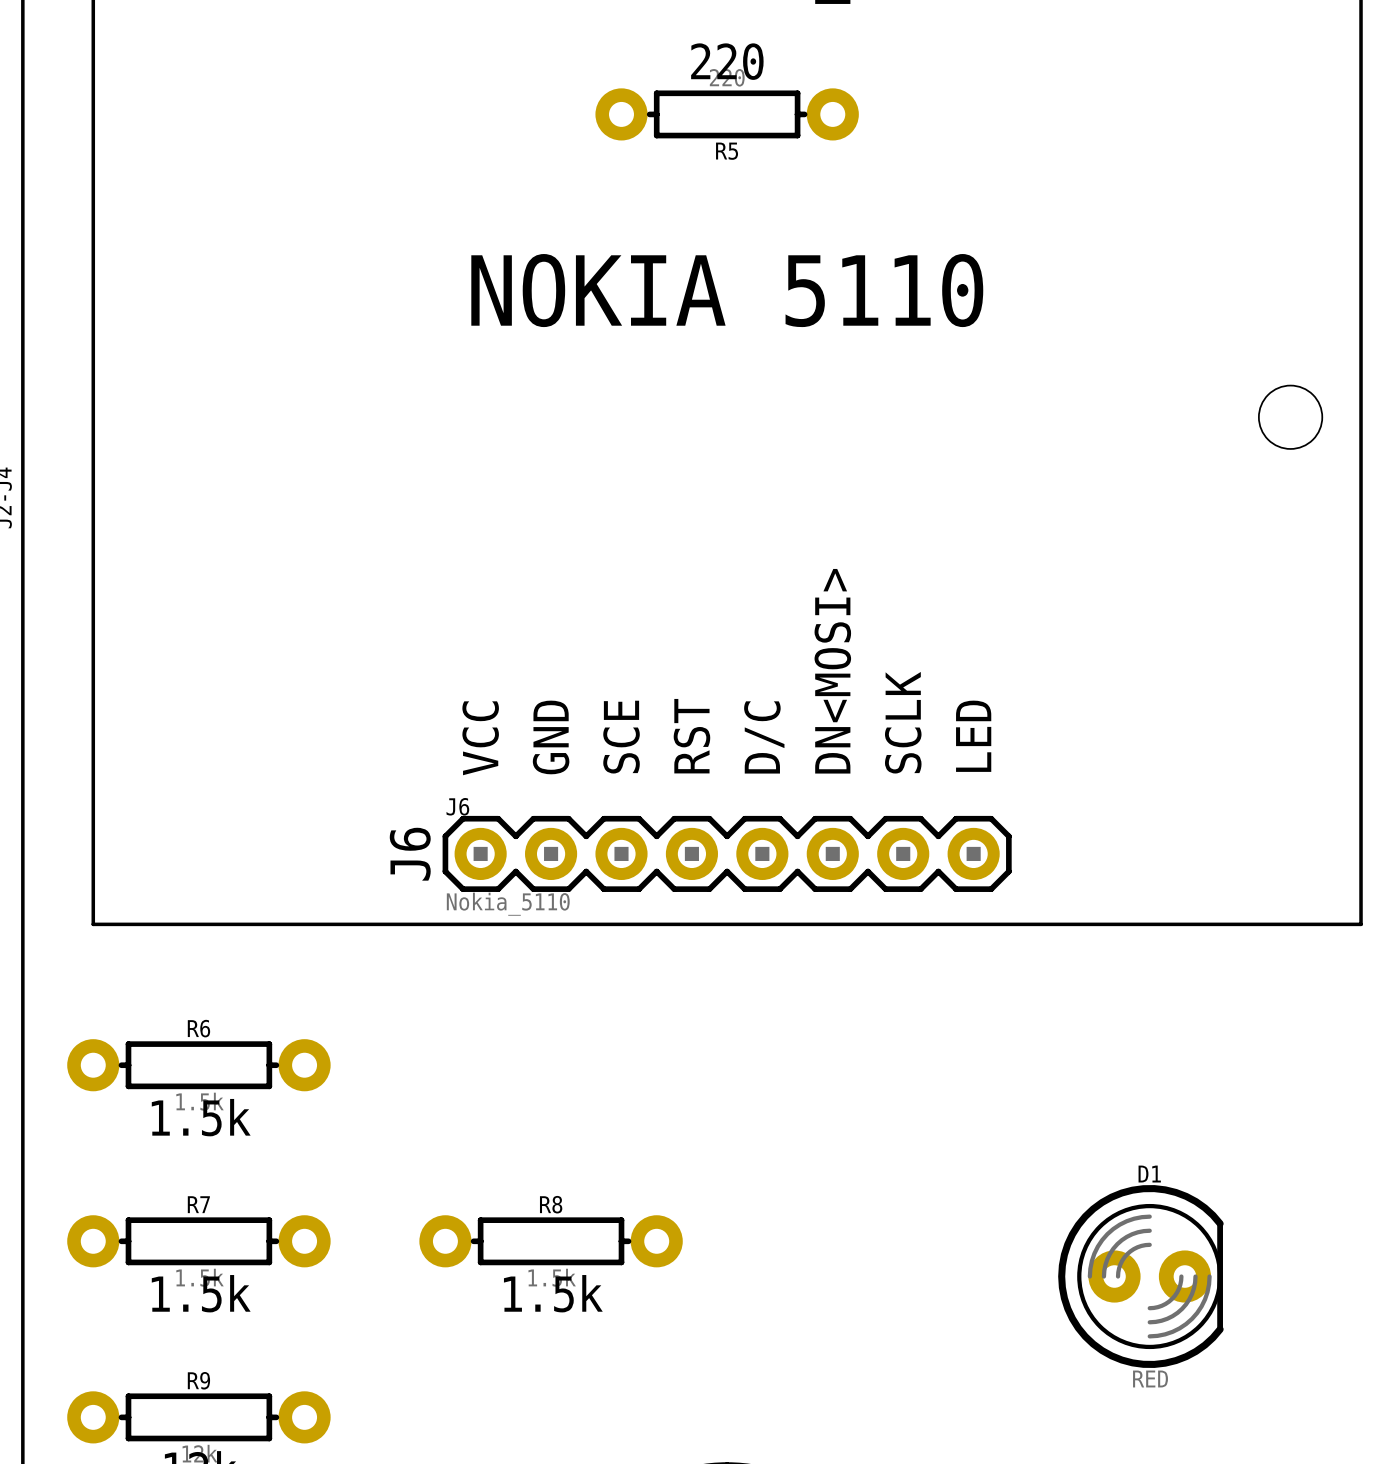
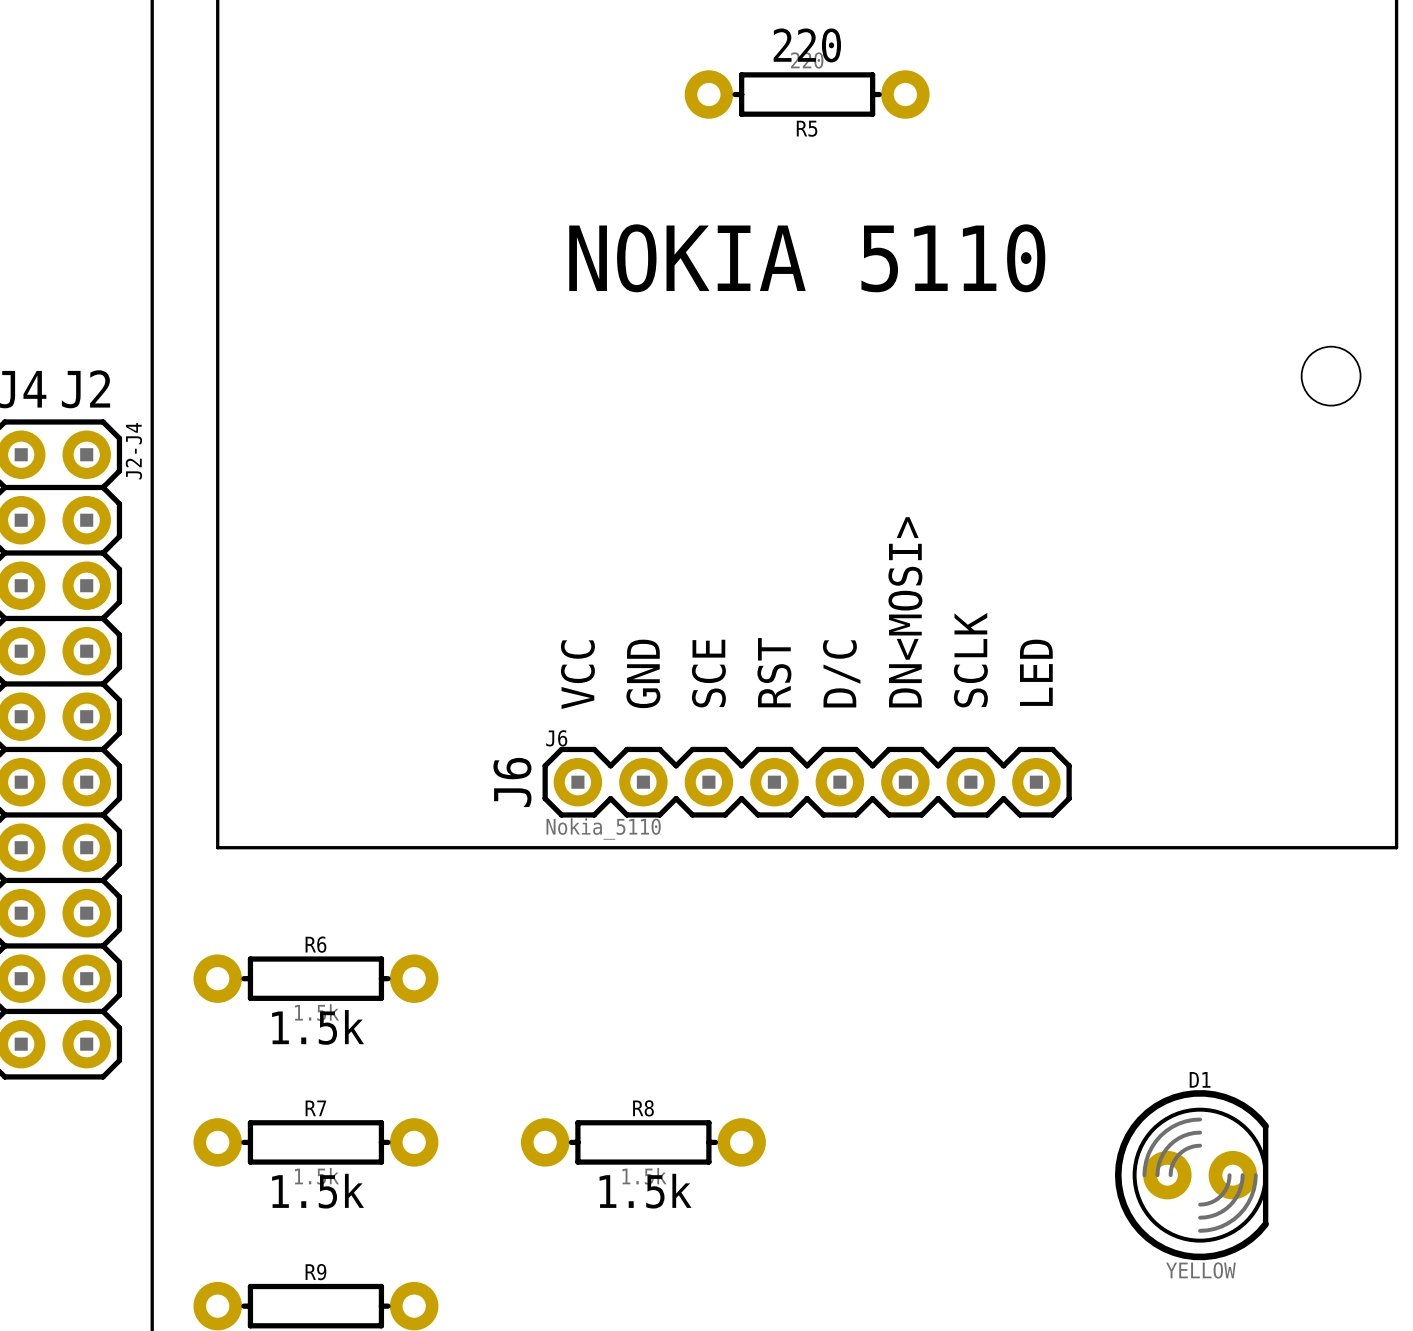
D1 value: RED (1150, 1378) -> YELLOW (1200, 1270)

